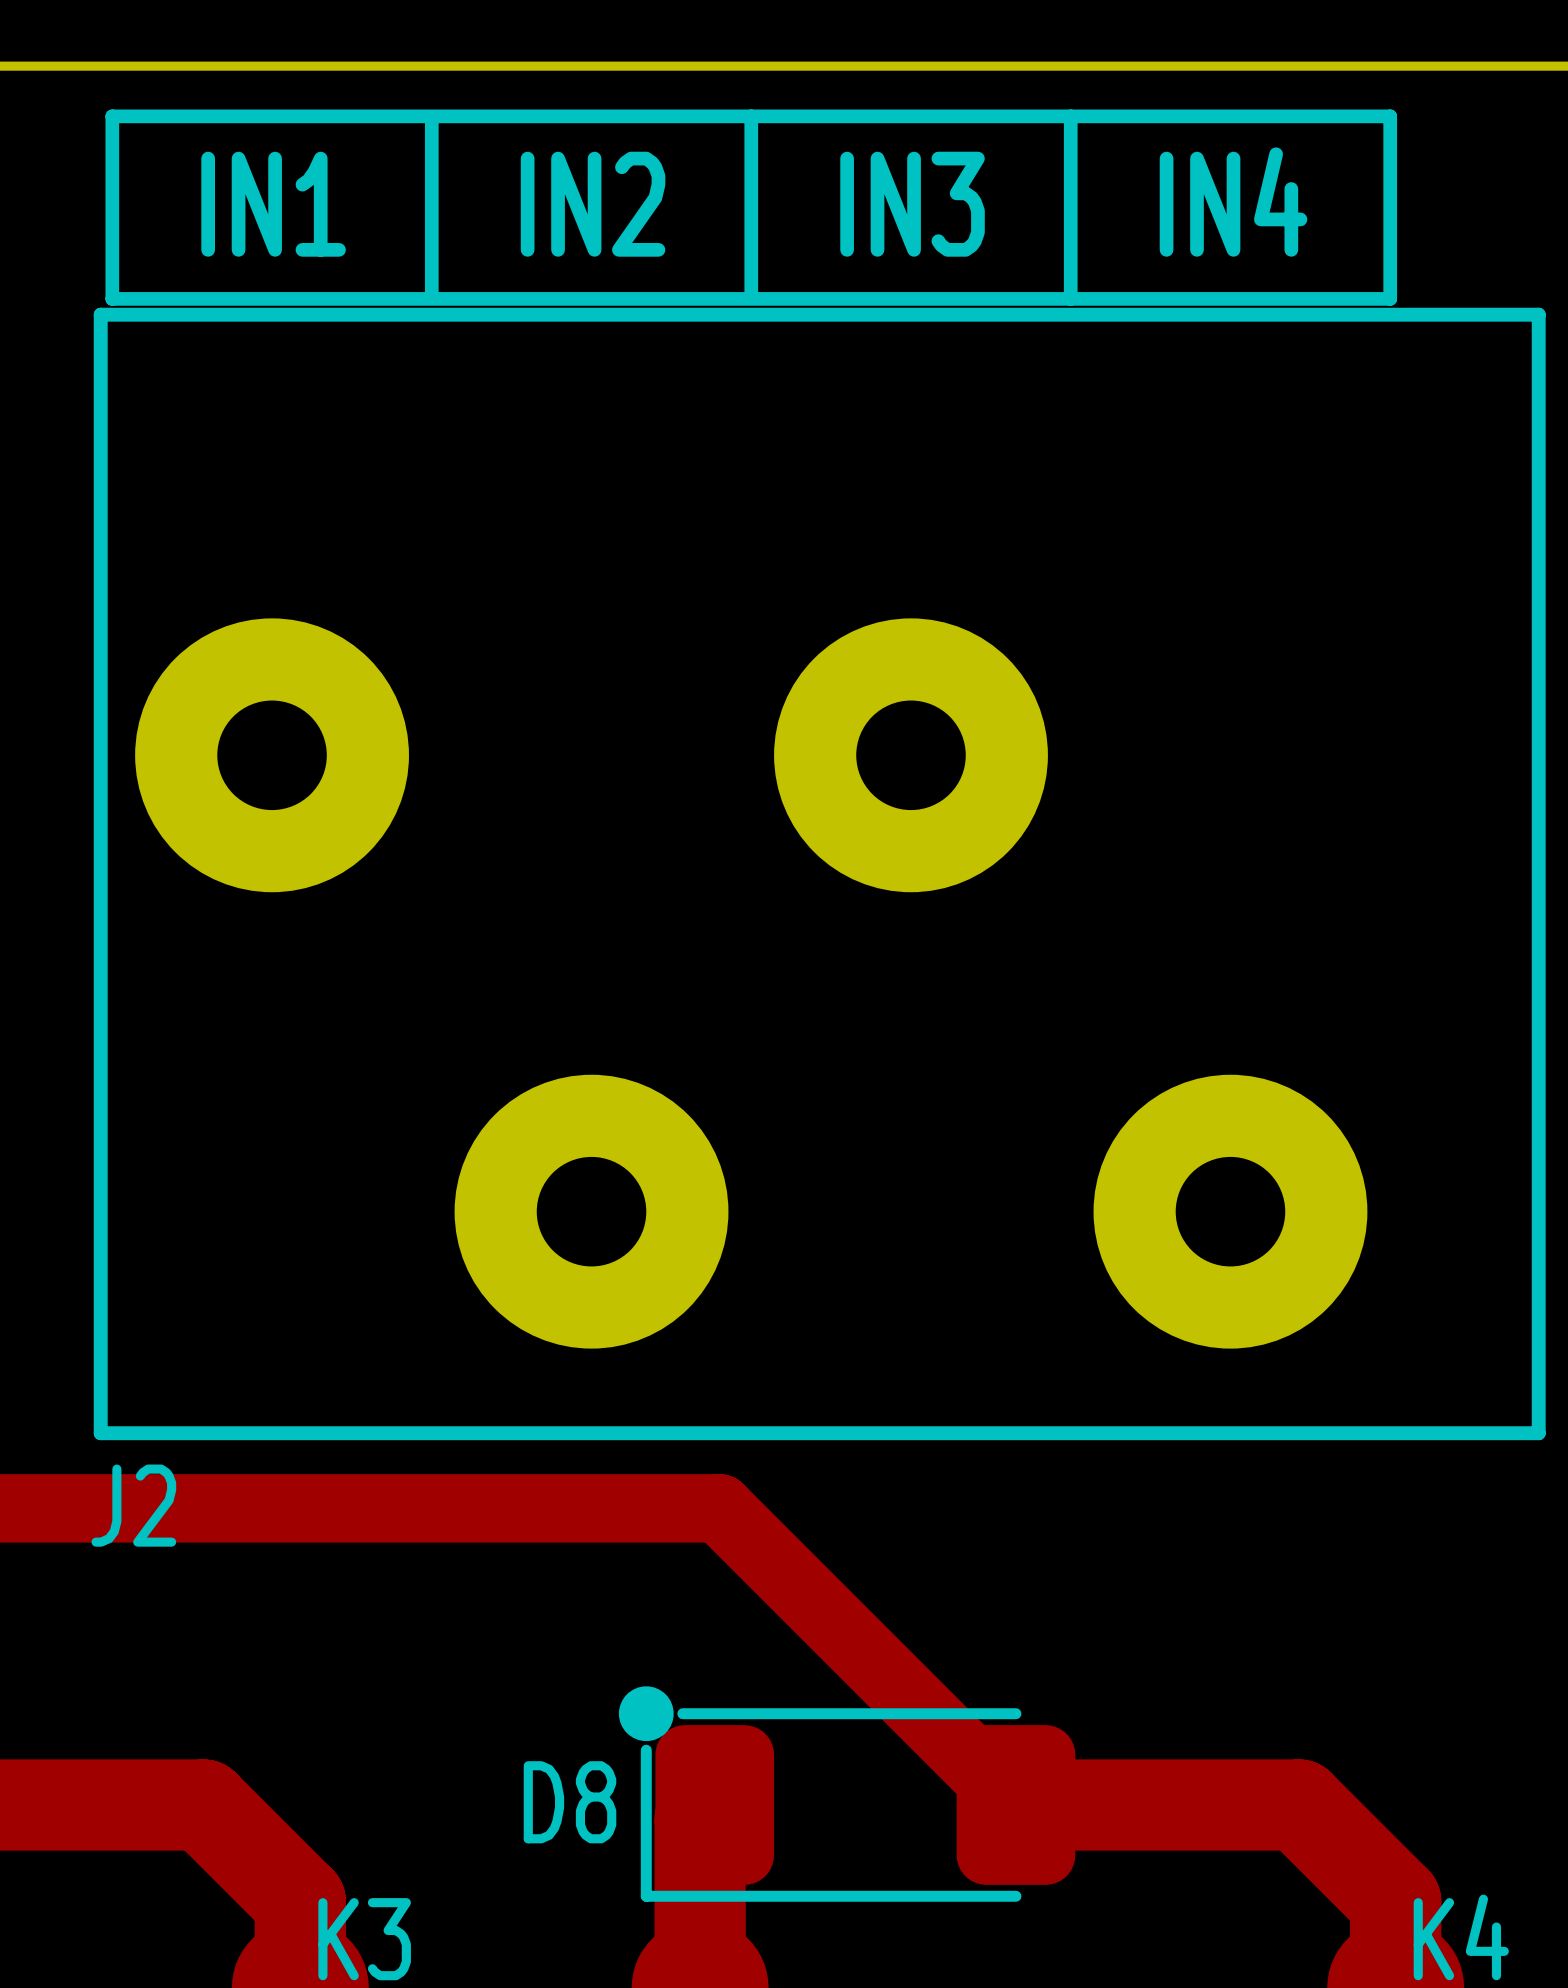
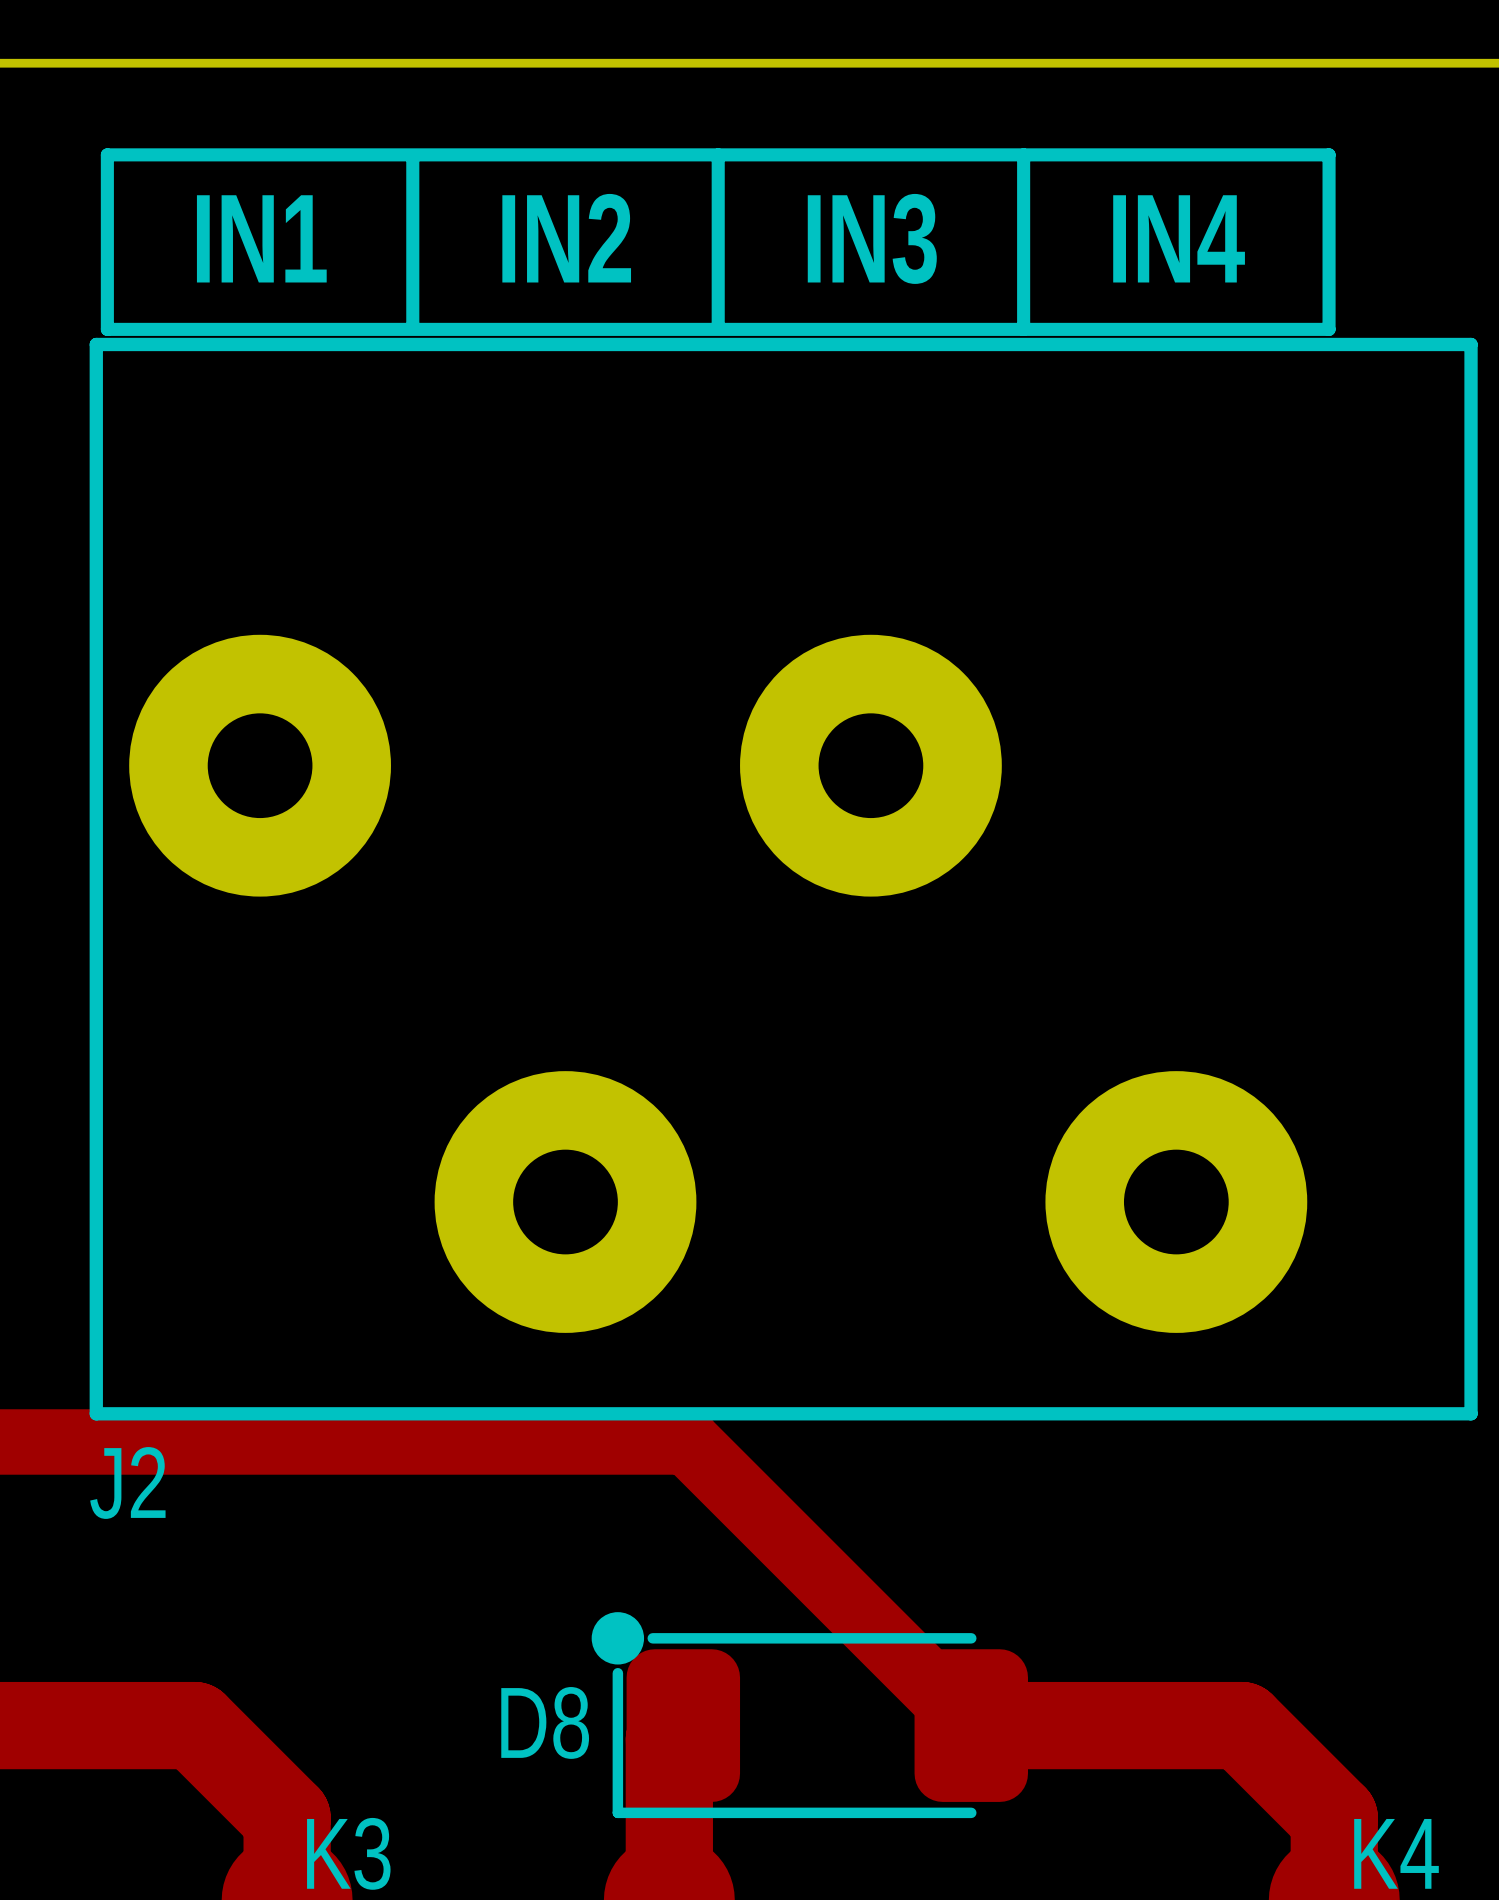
line: (751, 116) (751, 161) -> (718, 284) (718, 327)
line: (1070, 116) (1070, 161) -> (1023, 285) (1023, 329)
line: (431, 117) (431, 162) -> (412, 284) (412, 328)
line: (112, 161) (112, 116) (1390, 116) (1390, 161) -> (107, 154) (1329, 154)
text position: IN4 (1233, 202) -> IN4 (1179, 238)
text position: IN1 (273, 204) -> IN1 (261, 238)
text position: IN2 (593, 204) -> IN2 (566, 238)
text position: IN3 (912, 204) -> IN3 (872, 238)
line: (112, 298) (1390, 298) -> (107, 285) (107, 329) (1329, 329) (1329, 285)
J2 position: (819, 873) -> (783, 879)

